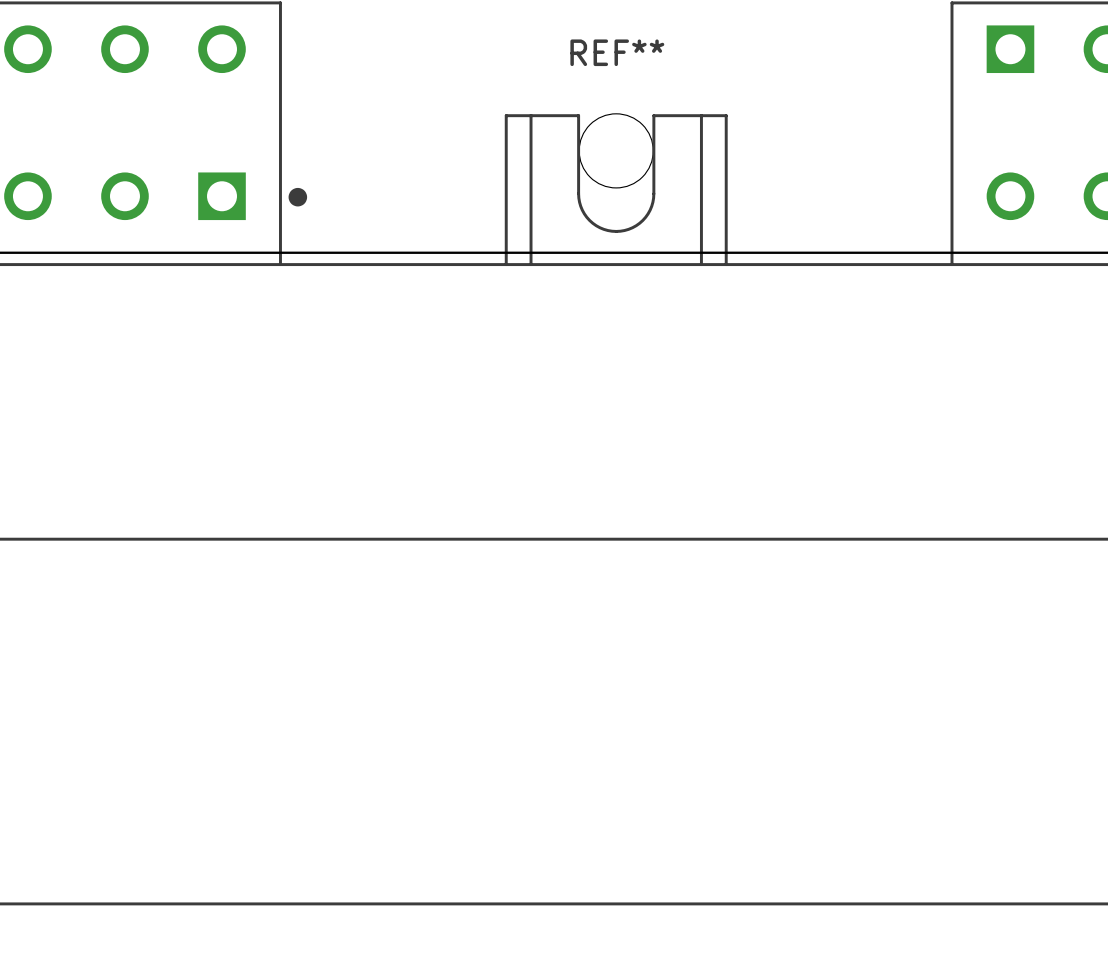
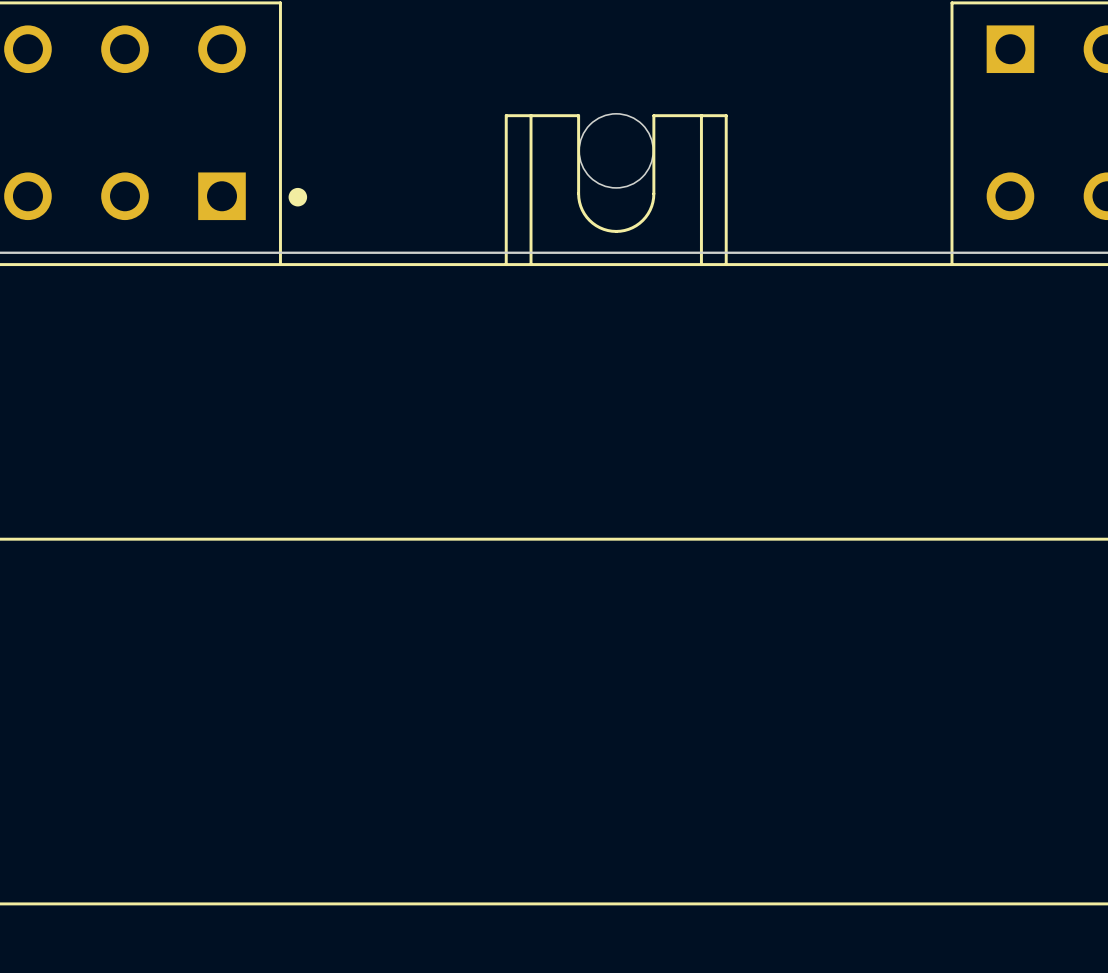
REF** name: REF** (617, 52) -> none

